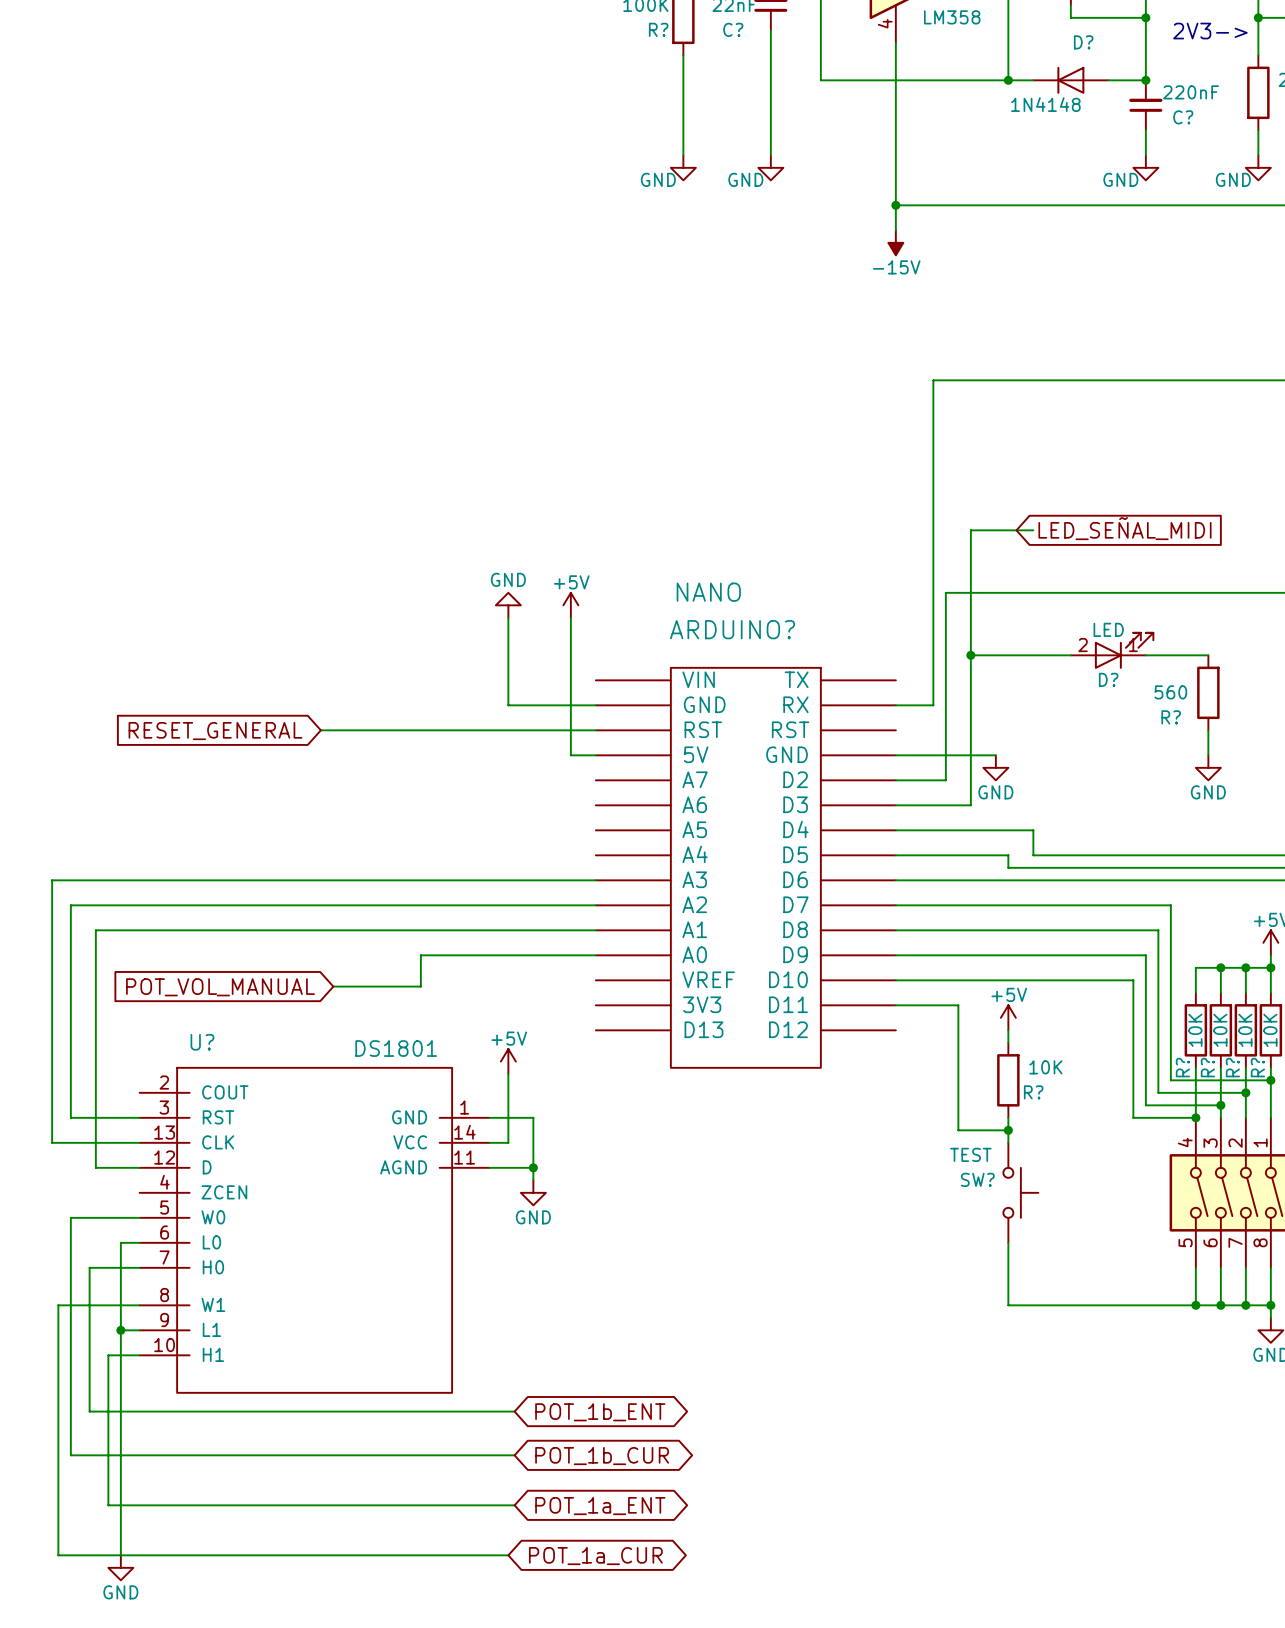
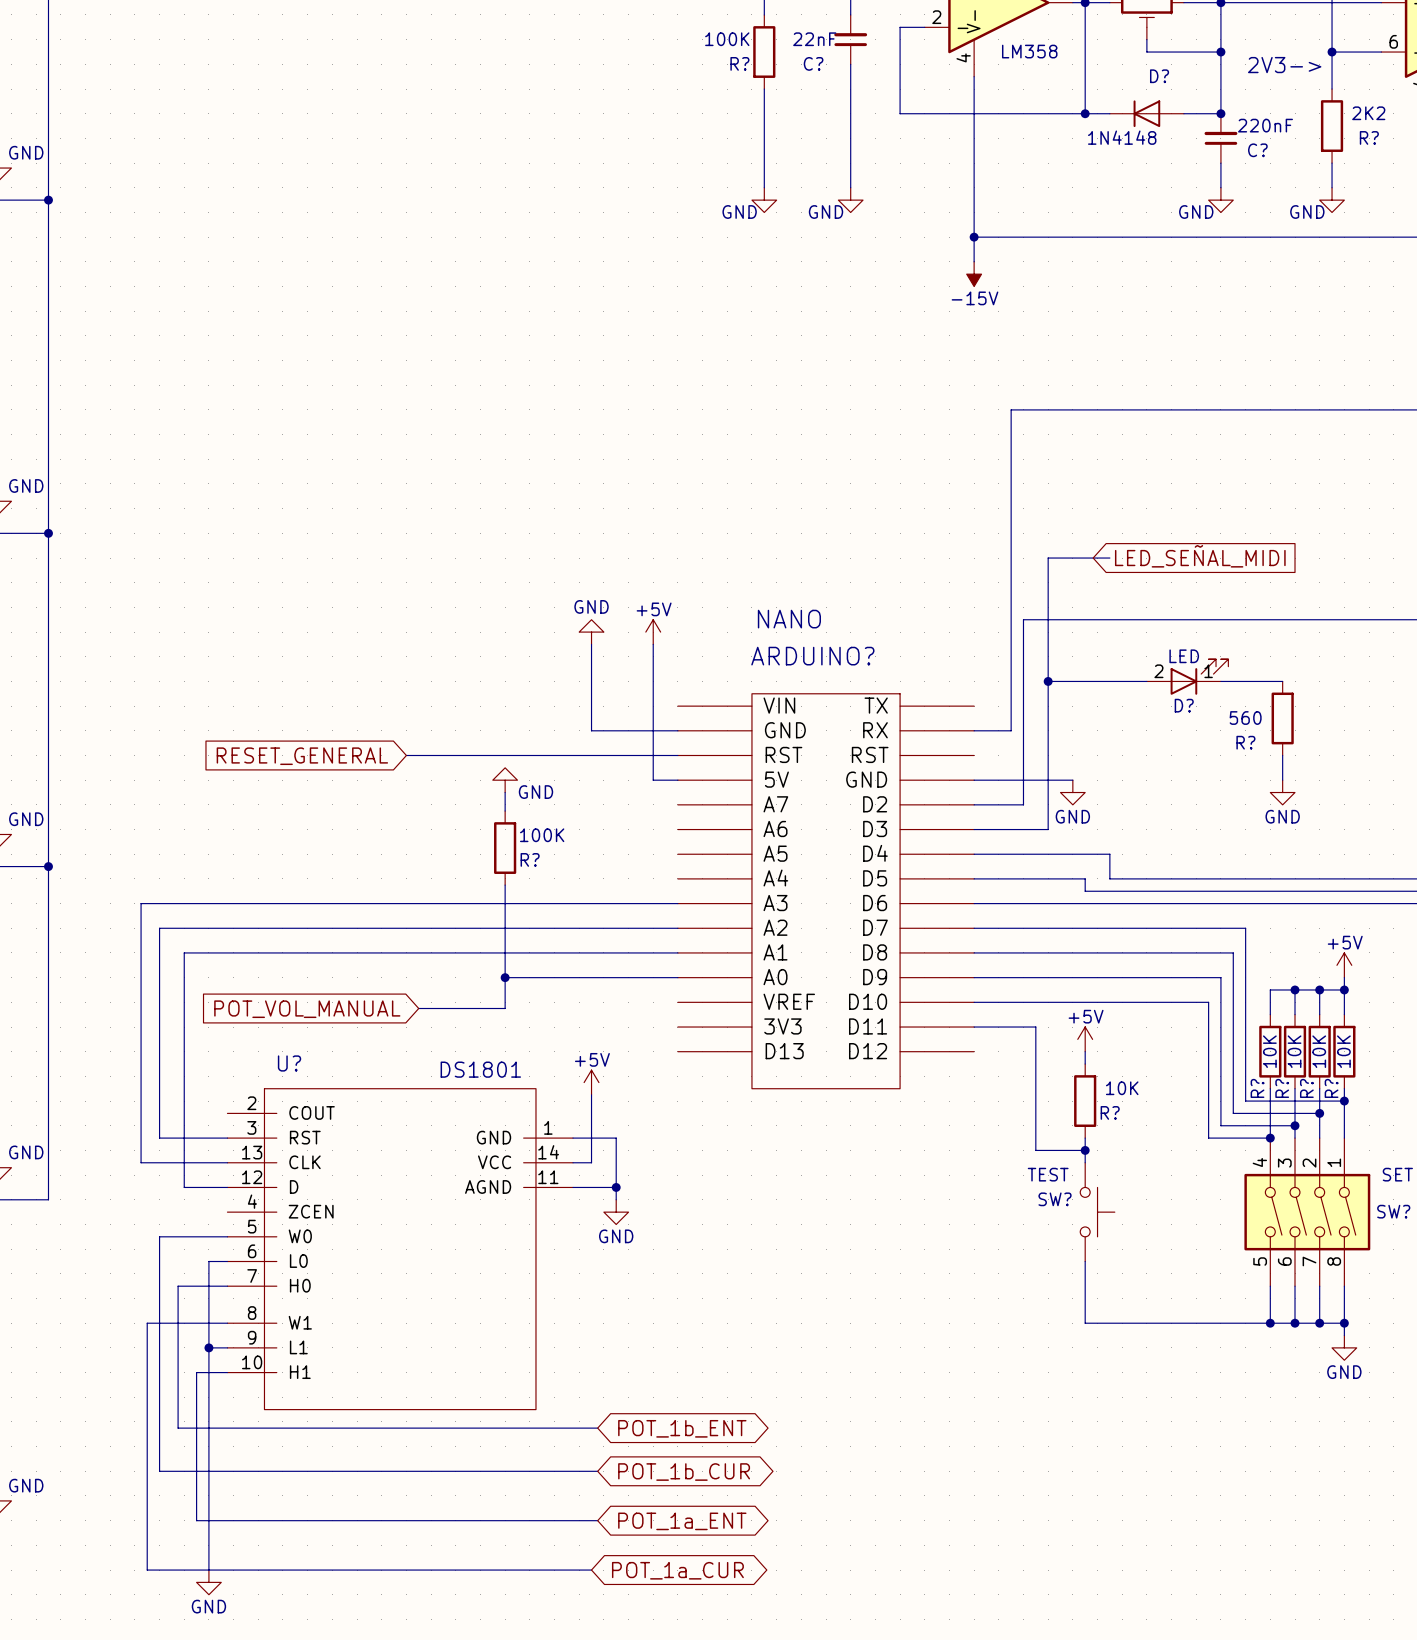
power symbol: none -> GND (505, 780)
wire: none -> (505, 792) (505, 811)
R?: none -> 100K (505, 848)
wire: none -> (505, 885) (505, 977)
junction: none -> (505, 977)

